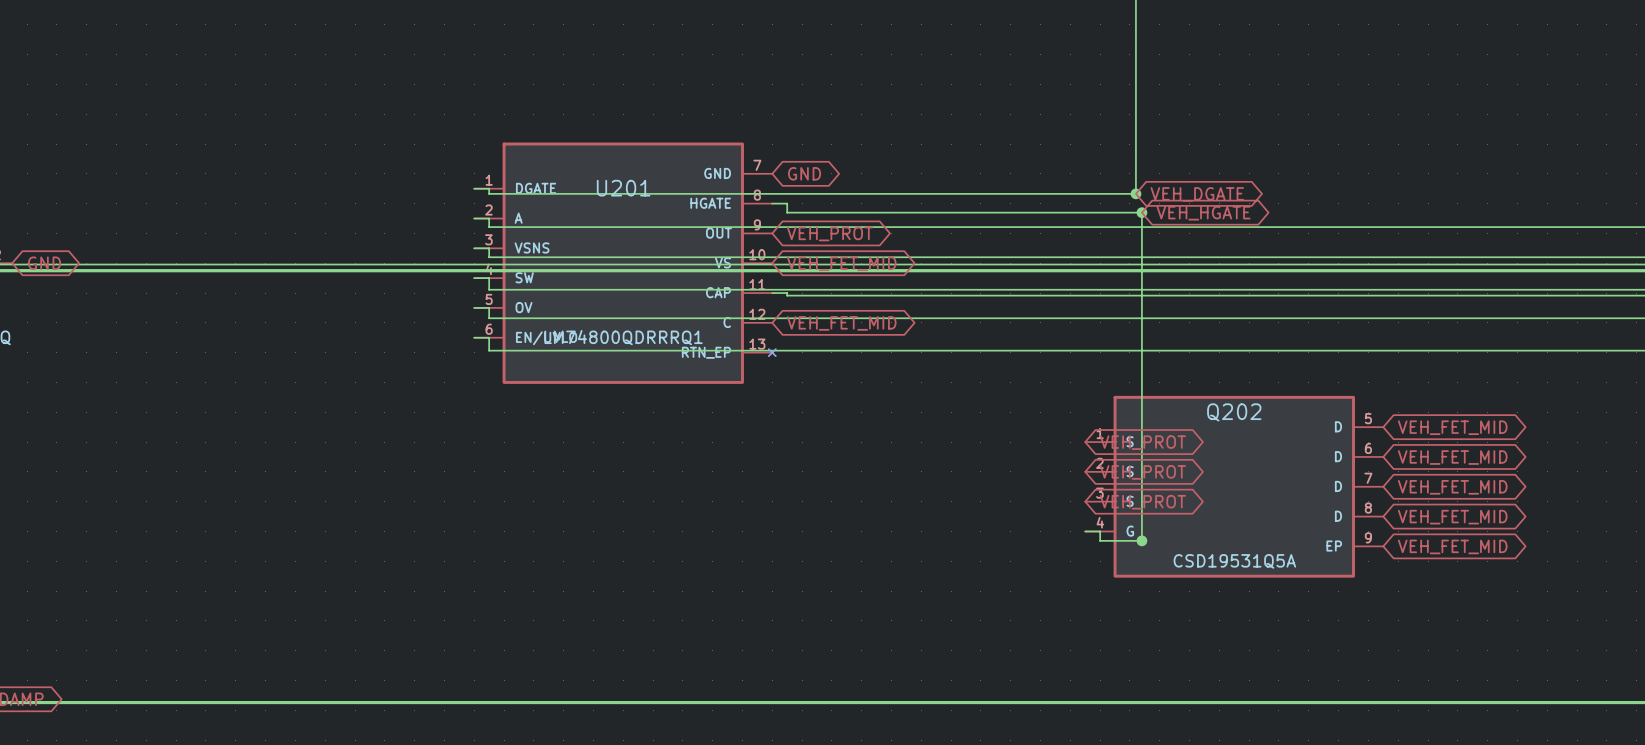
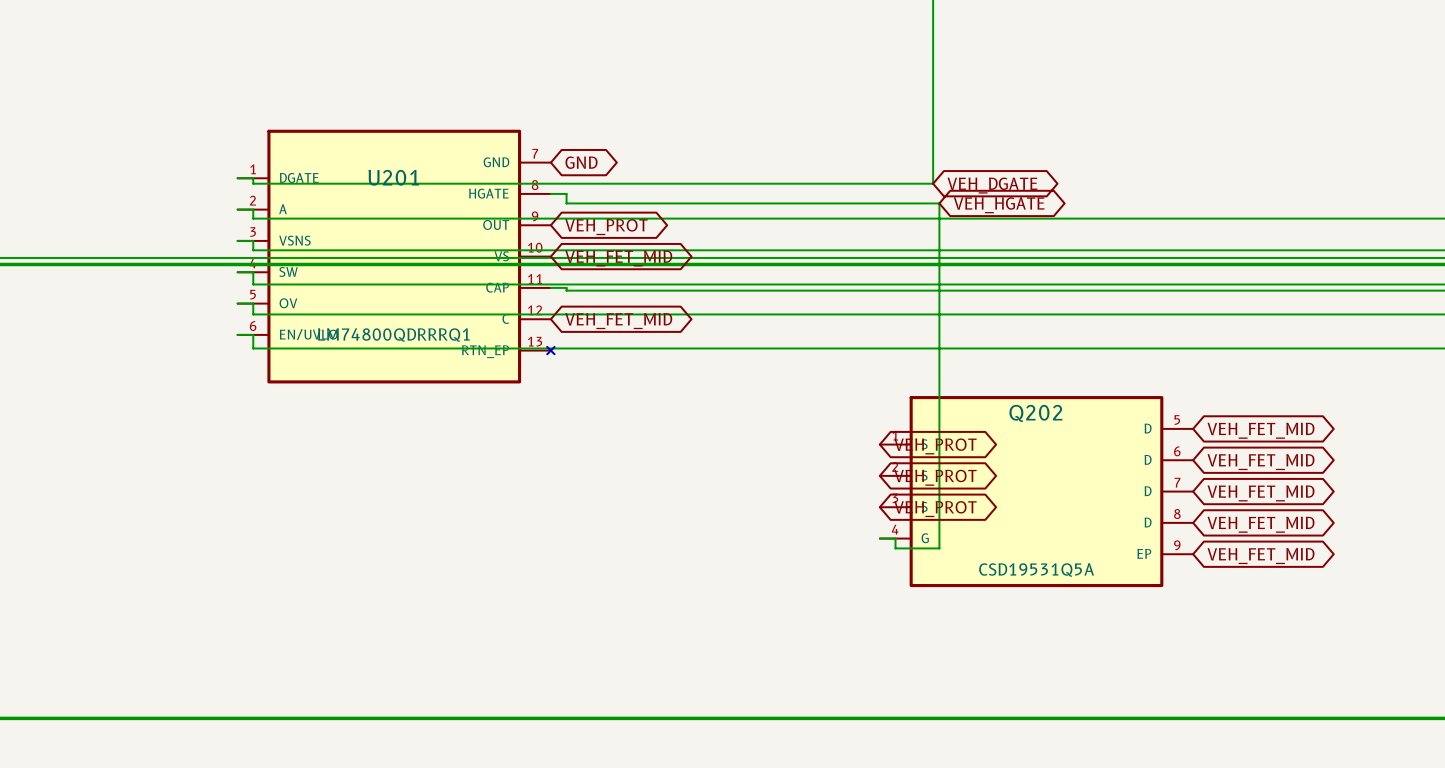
junction: (1135, 193) -> none
junction: (1141, 212) -> none
junction: (1141, 540) -> none

